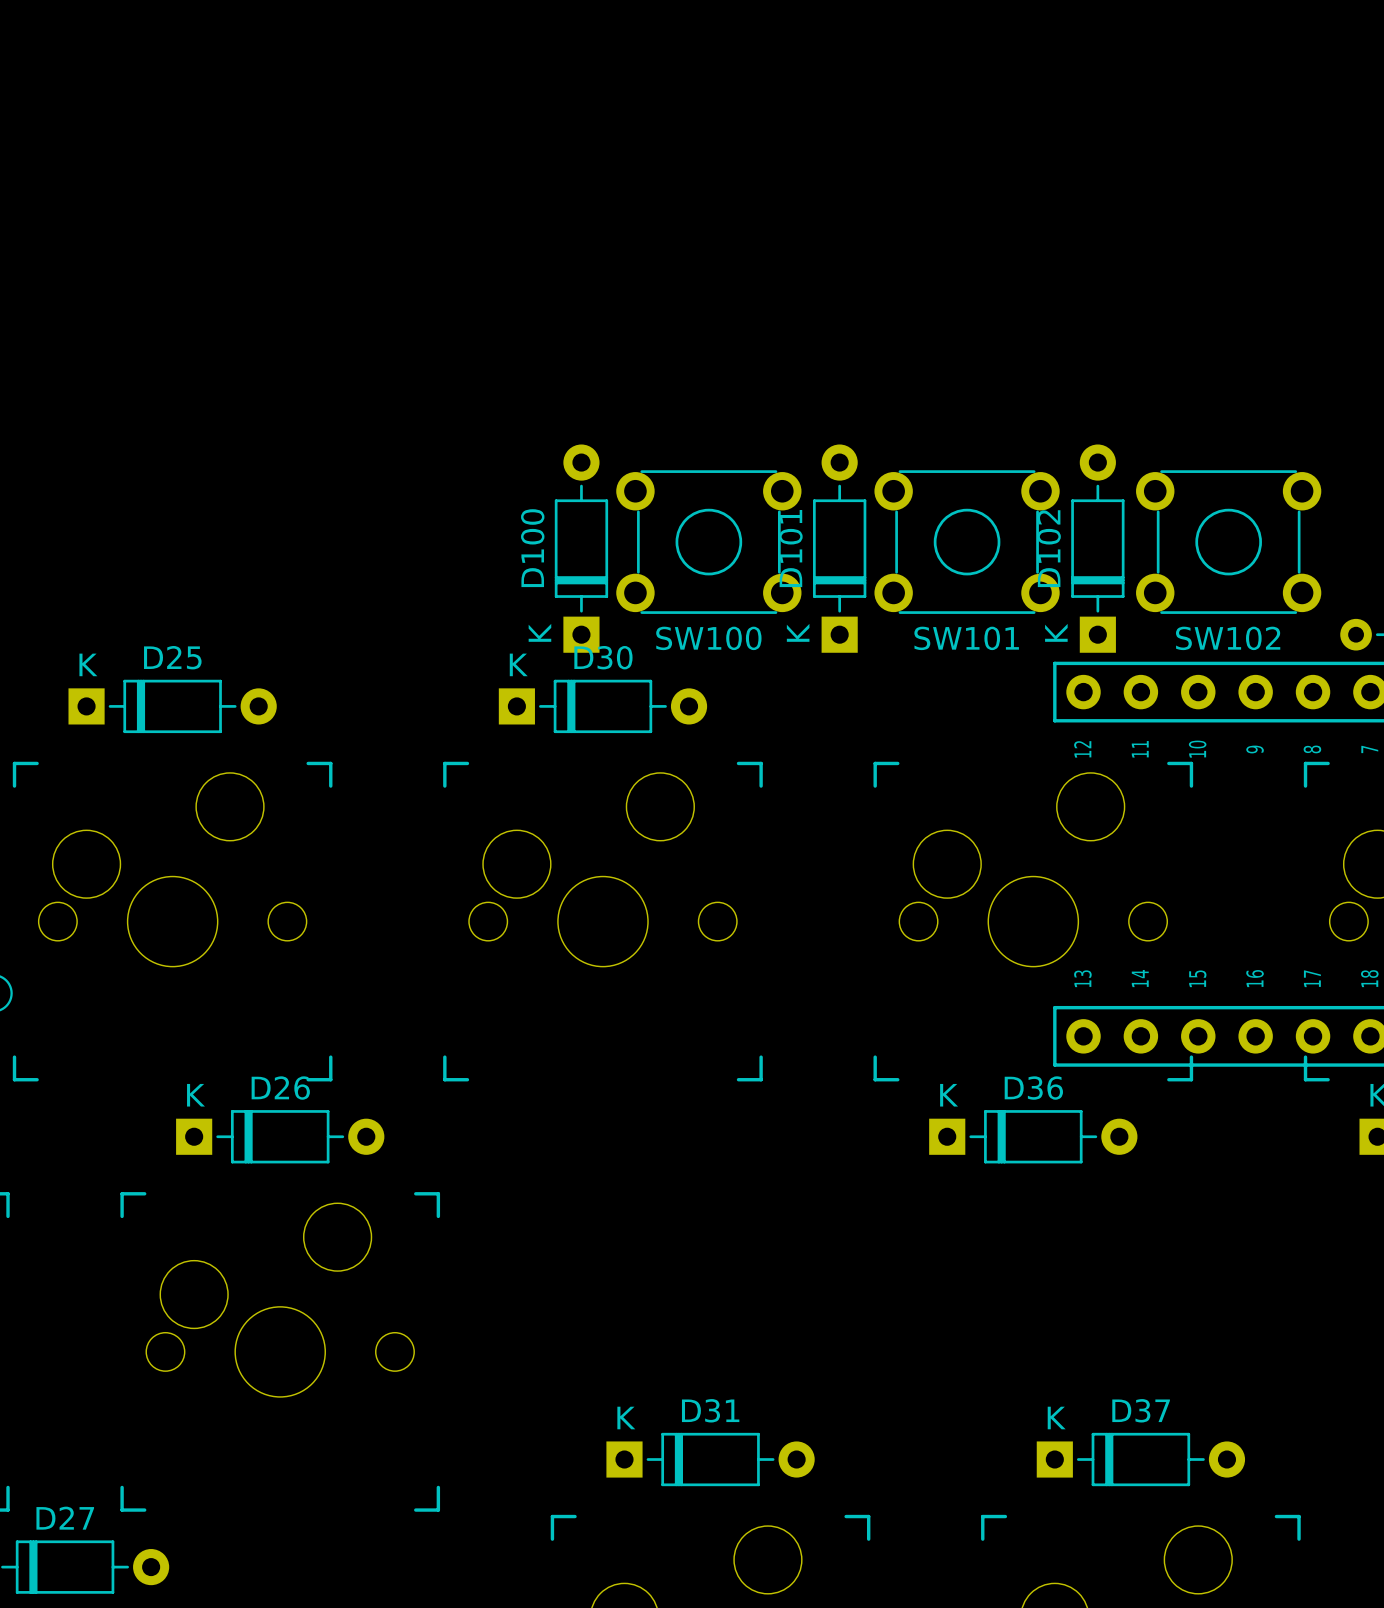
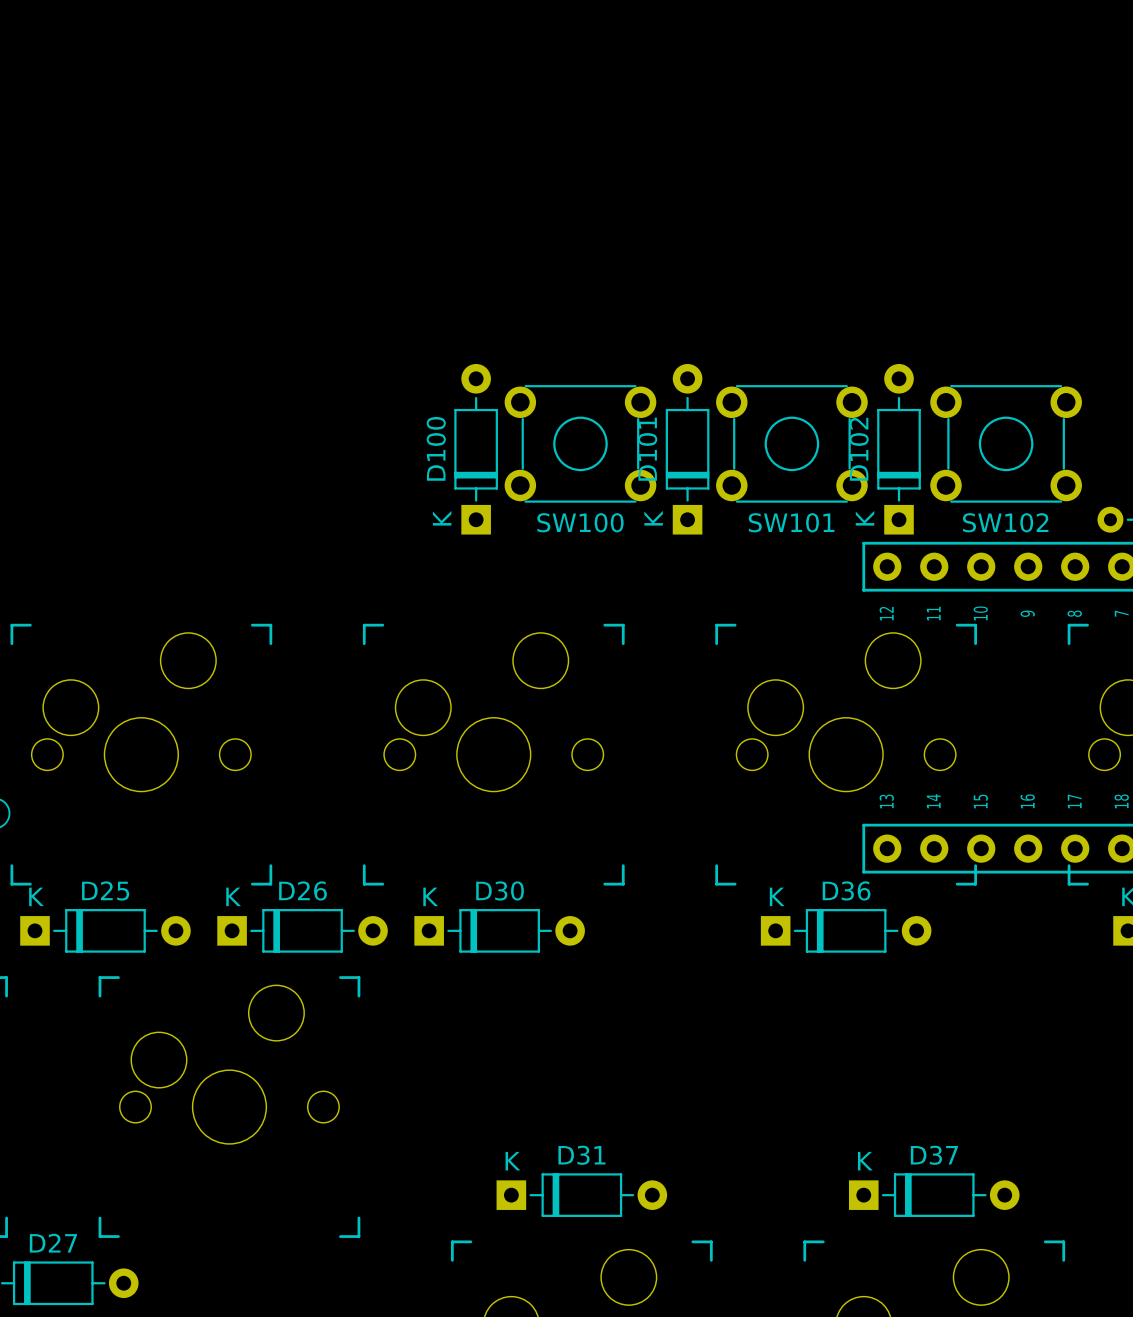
D25 position: (172, 706) -> (105, 930)
D30 position: (602, 706) -> (499, 930)
D26 position: (280, 1136) -> (302, 930)

